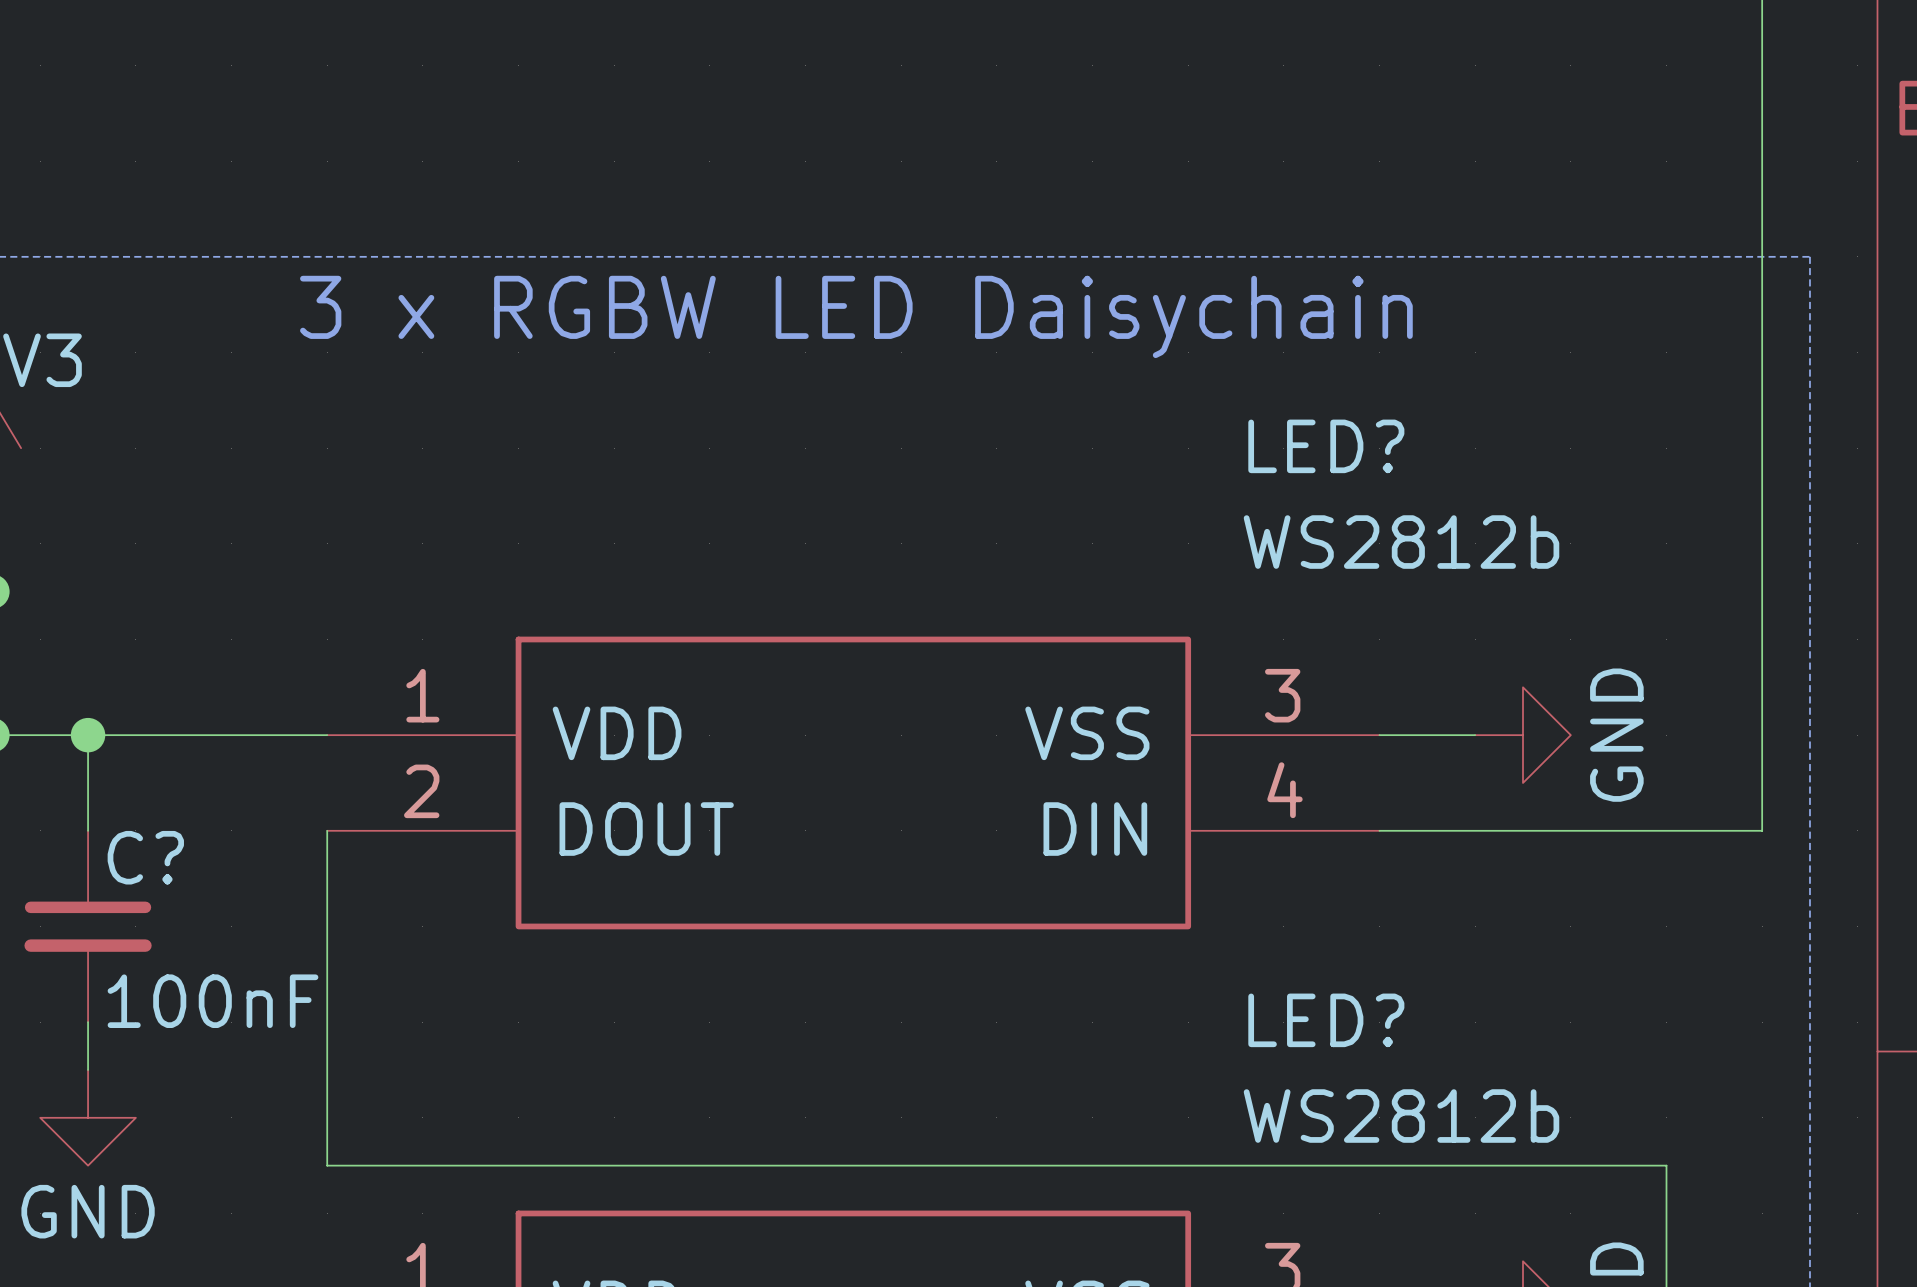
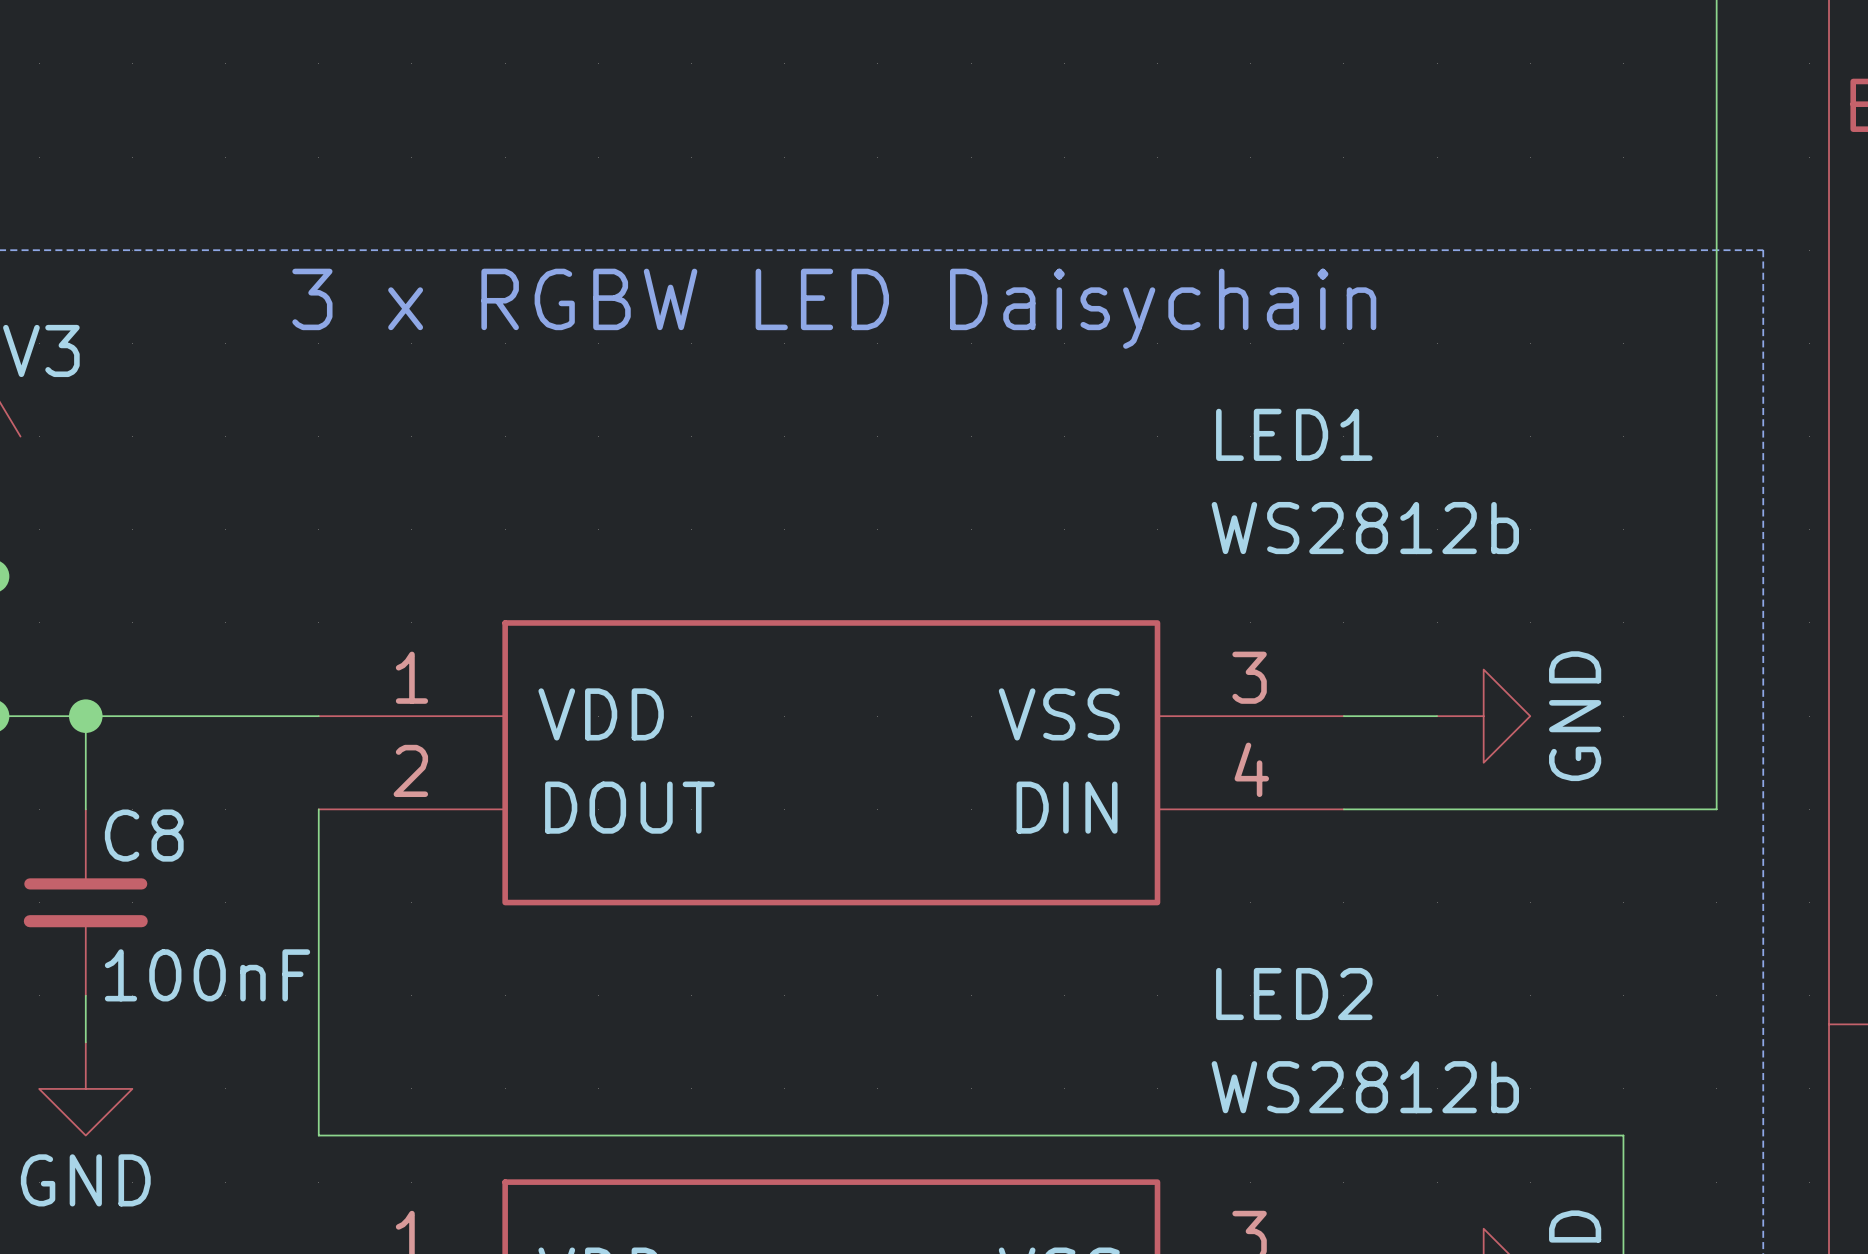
LED? name: LED? (1326, 446) -> LED1 (1294, 434)
C? name: C? (145, 857) -> C8 (144, 835)
LED? name: LED? (1326, 1020) -> LED2 (1294, 994)

